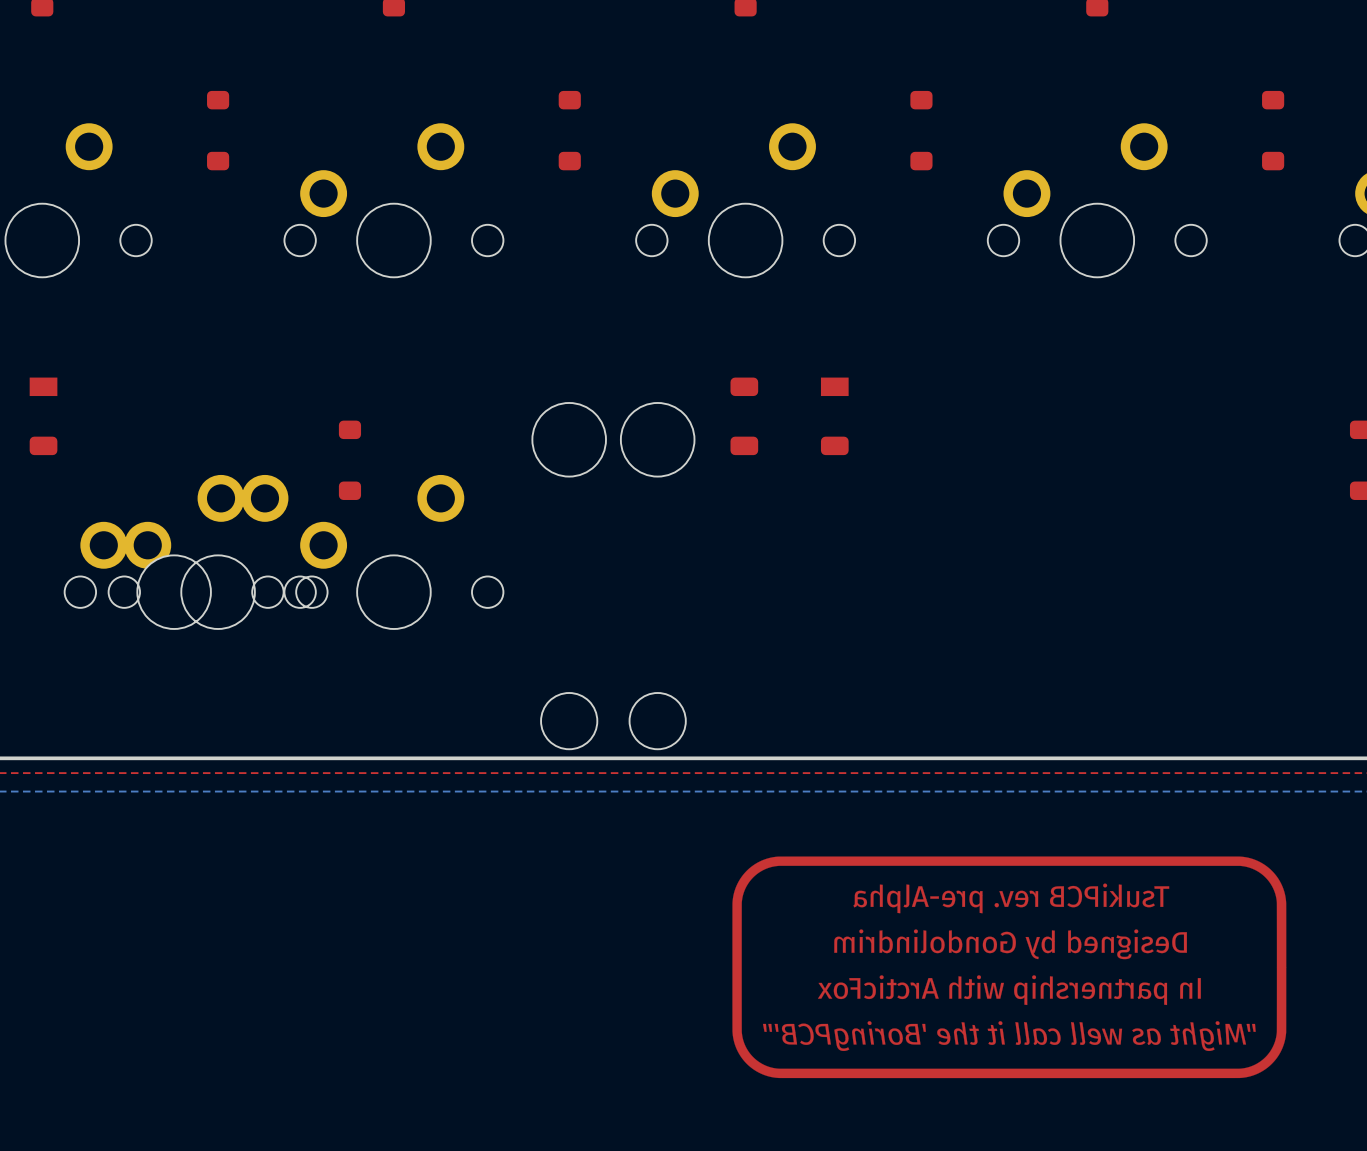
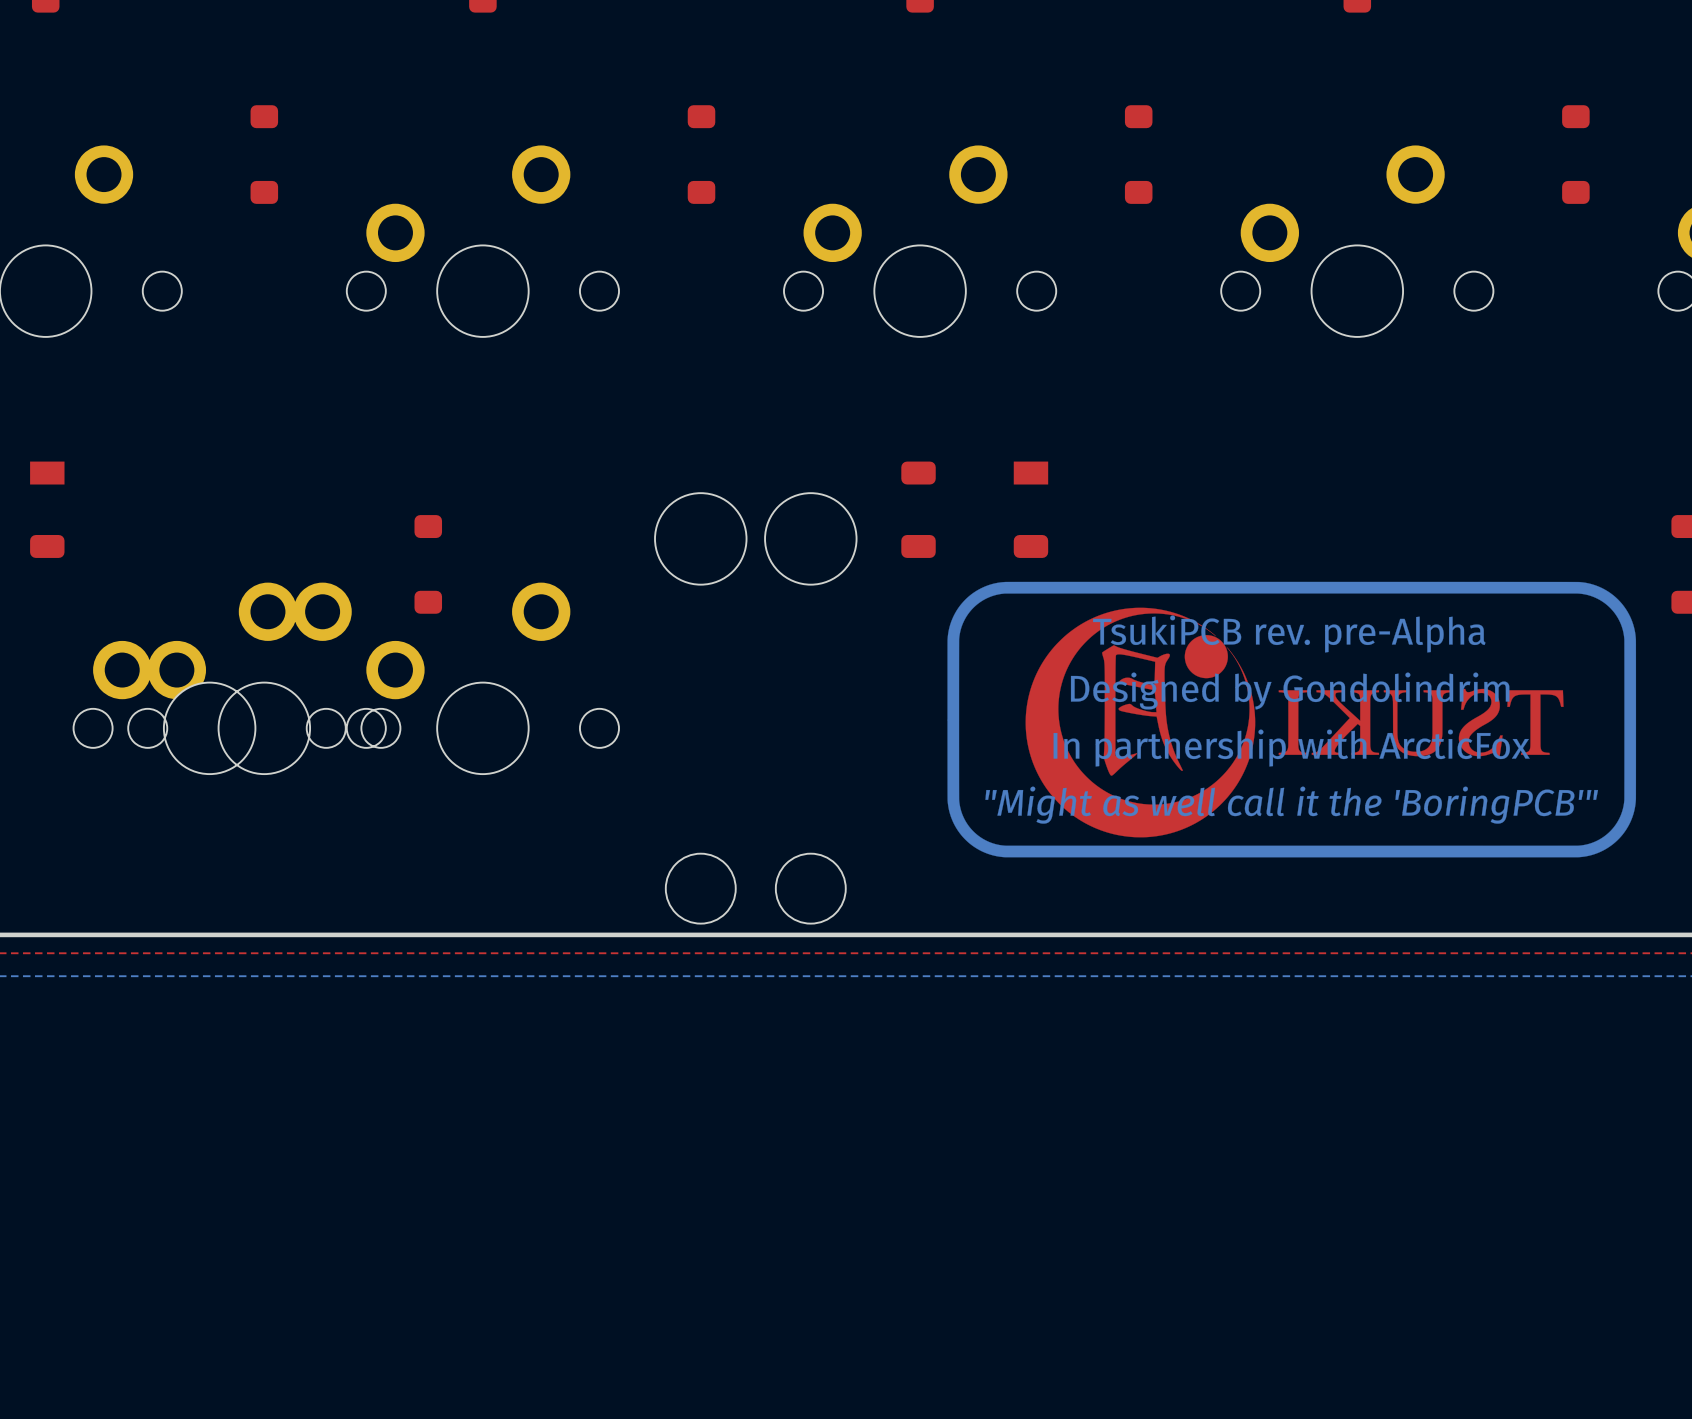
part: none -> (1294, 722)
part side: top (1009, 967) -> bottom (1291, 719)

